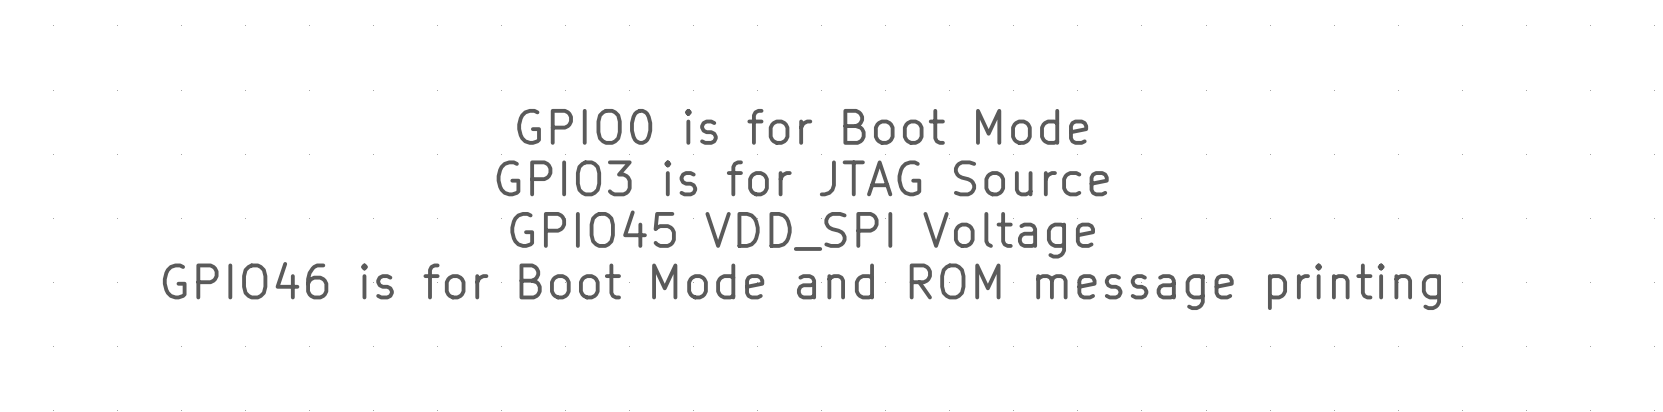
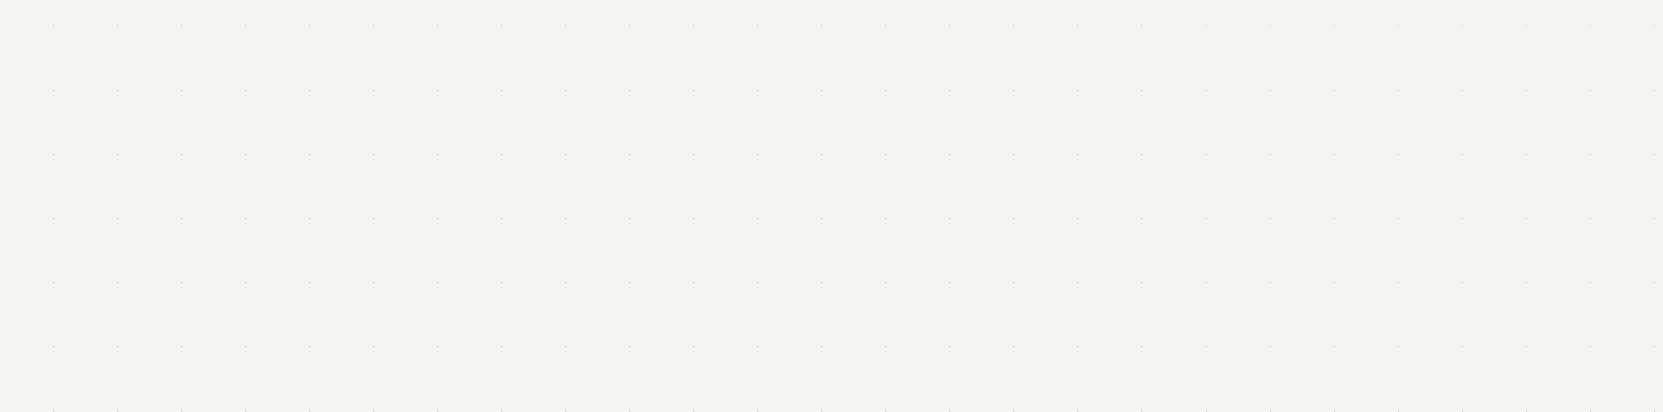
text: GPIO0 is for Boot Mode (802, 126) -> none
text: GPIO3 is for JTAG Source (802, 178) -> none
text: GPIO45 VDD_SPI Voltage (802, 234) -> none
text: GPIO46 is for Boot Mode and ROM message printing (801, 286) -> none

